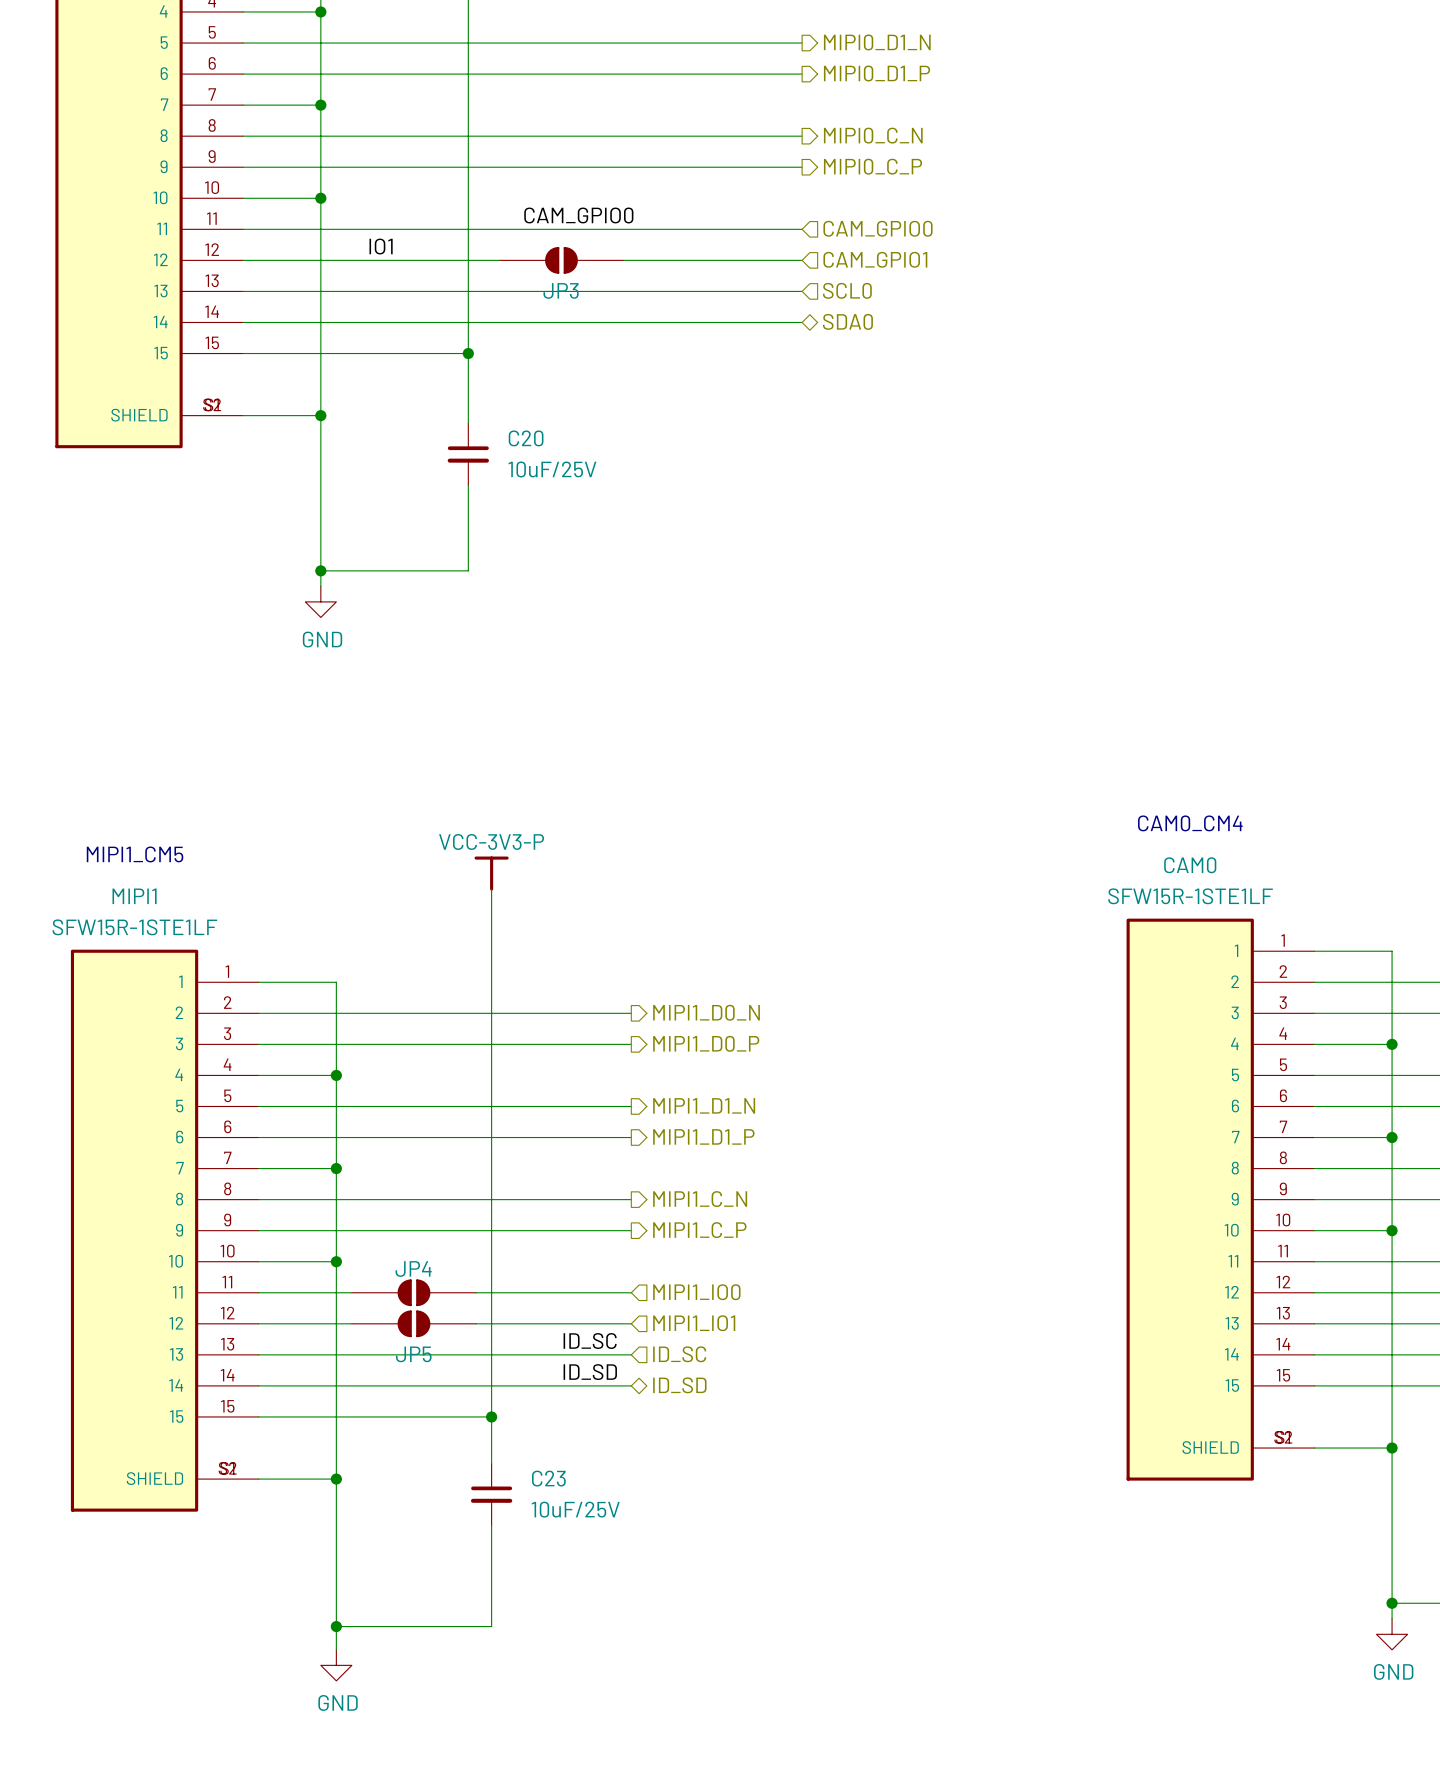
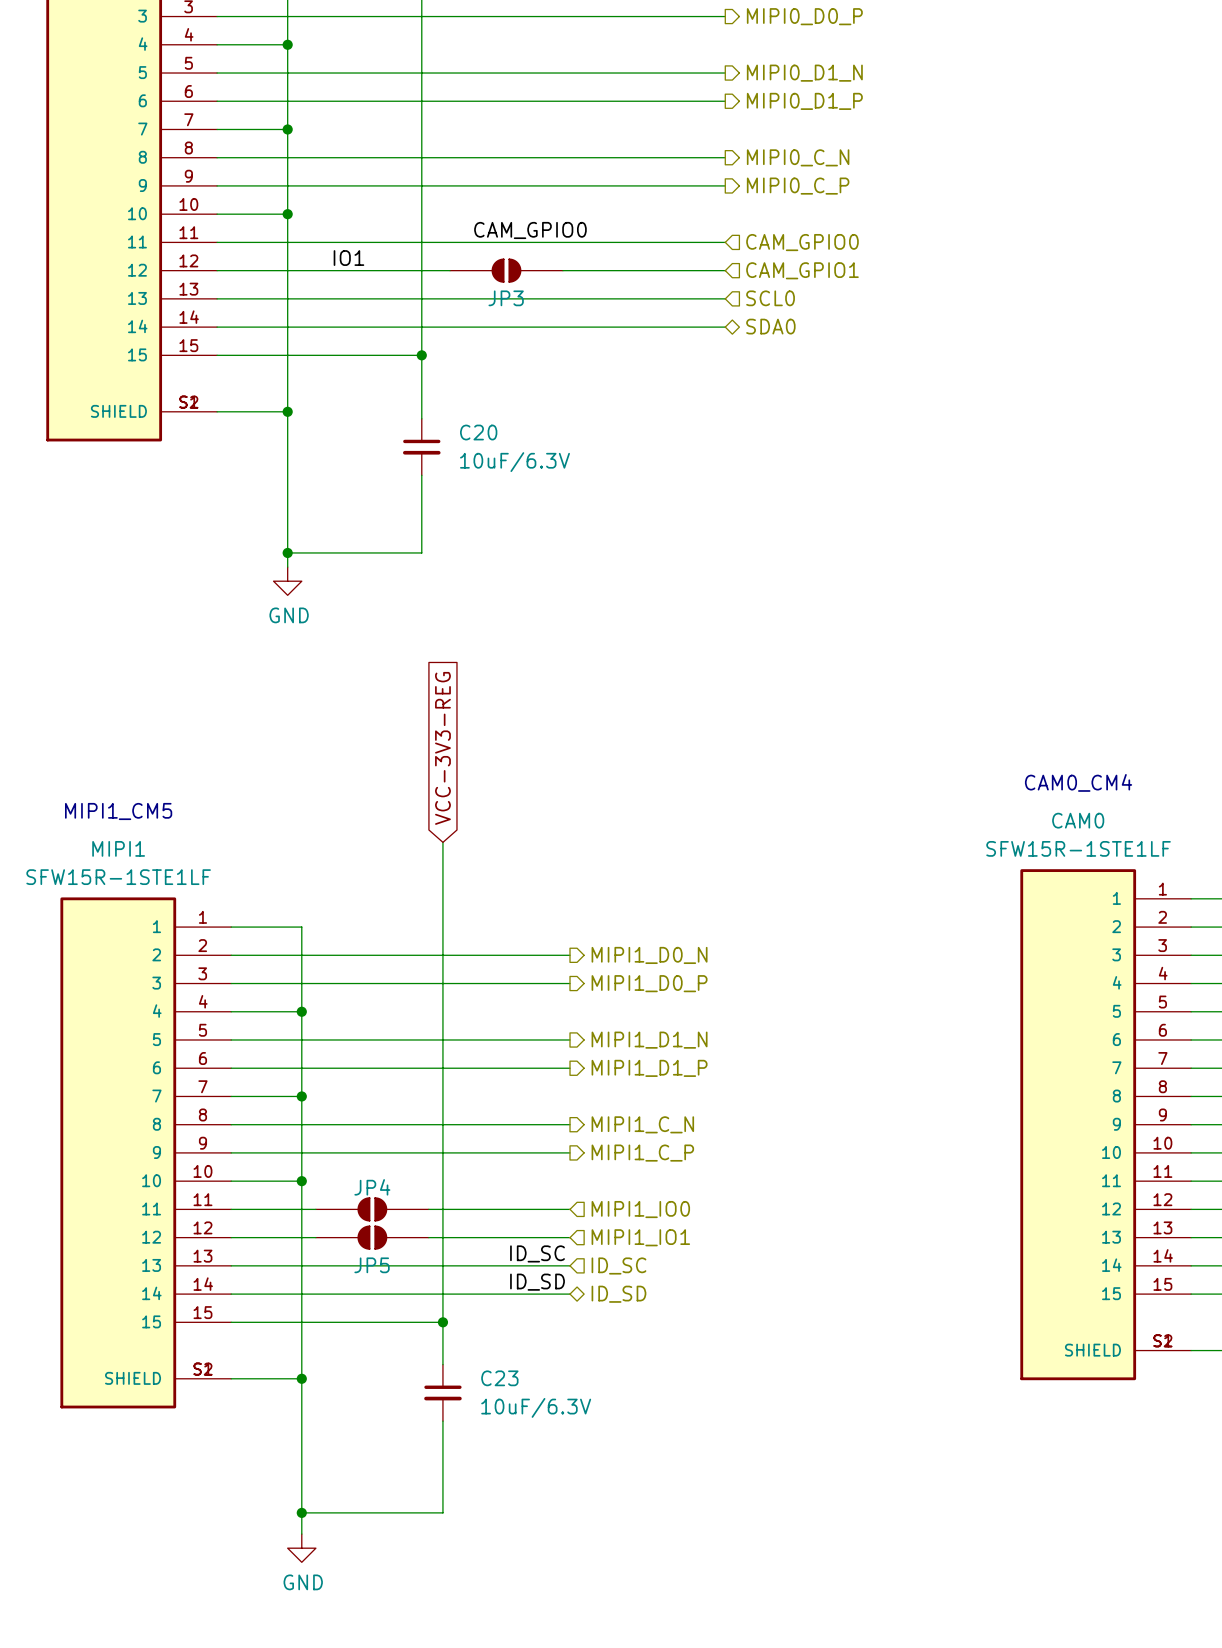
C20 value: 10uF/25V (552, 469) -> 10uF/6.3V (514, 462)
global label: none -> VCC-3V3-REG (442, 748)
power symbol: VCC-3V3-P (491, 873) -> none
C23 value: 10uF/25V (575, 1509) -> 10uF/6.3V (536, 1407)

